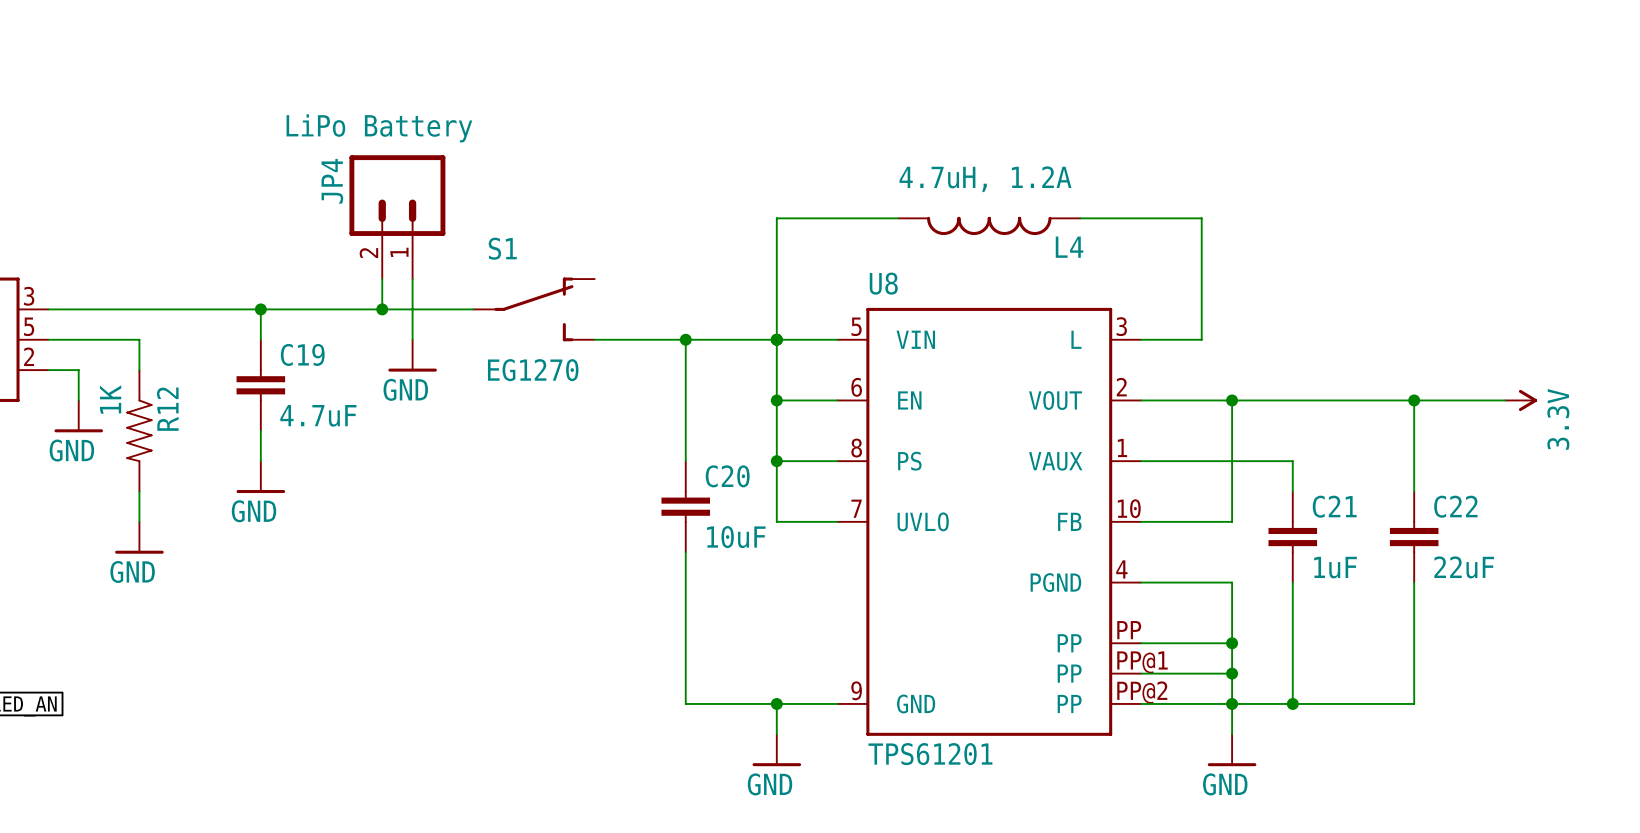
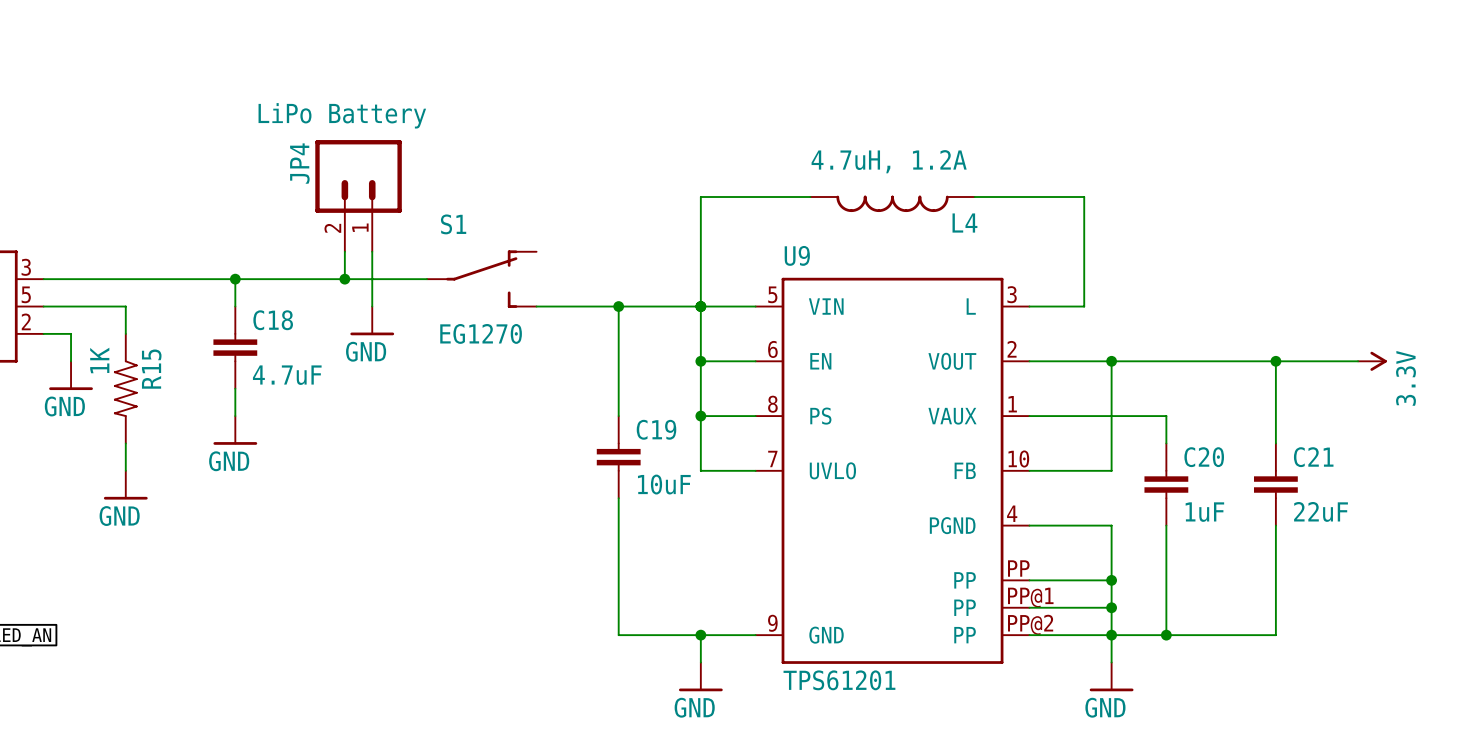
U8 name: U8 (883, 283) -> U9 (797, 255)
C19 name: C19 (302, 354) -> C18 (273, 320)
R12 name: R12 (167, 409) -> R15 (151, 369)
C20 name: C20 (727, 476) -> C19 (656, 429)
C21 name: C21 (1334, 506) -> C20 (1204, 457)
C22 name: C22 (1455, 506) -> C21 (1313, 457)

